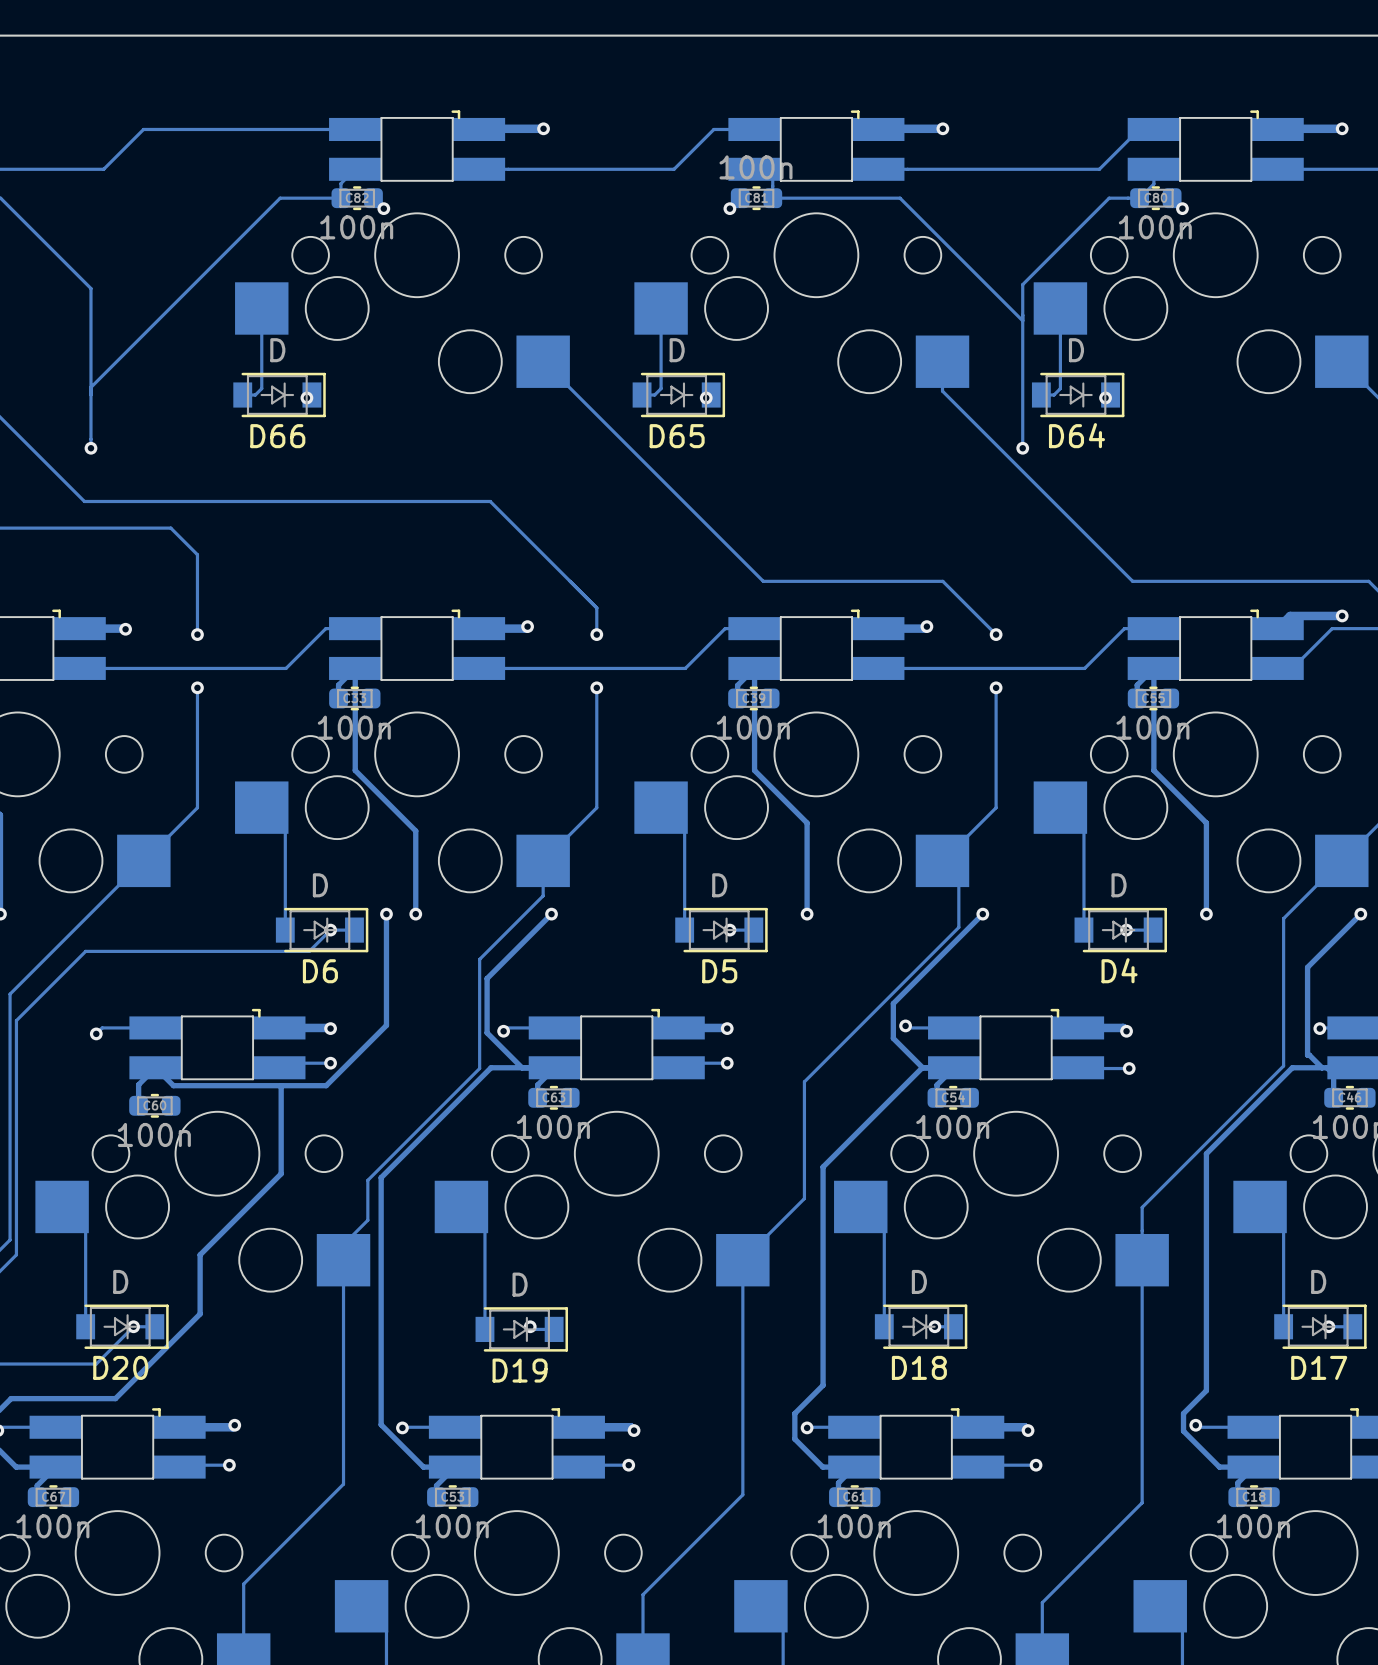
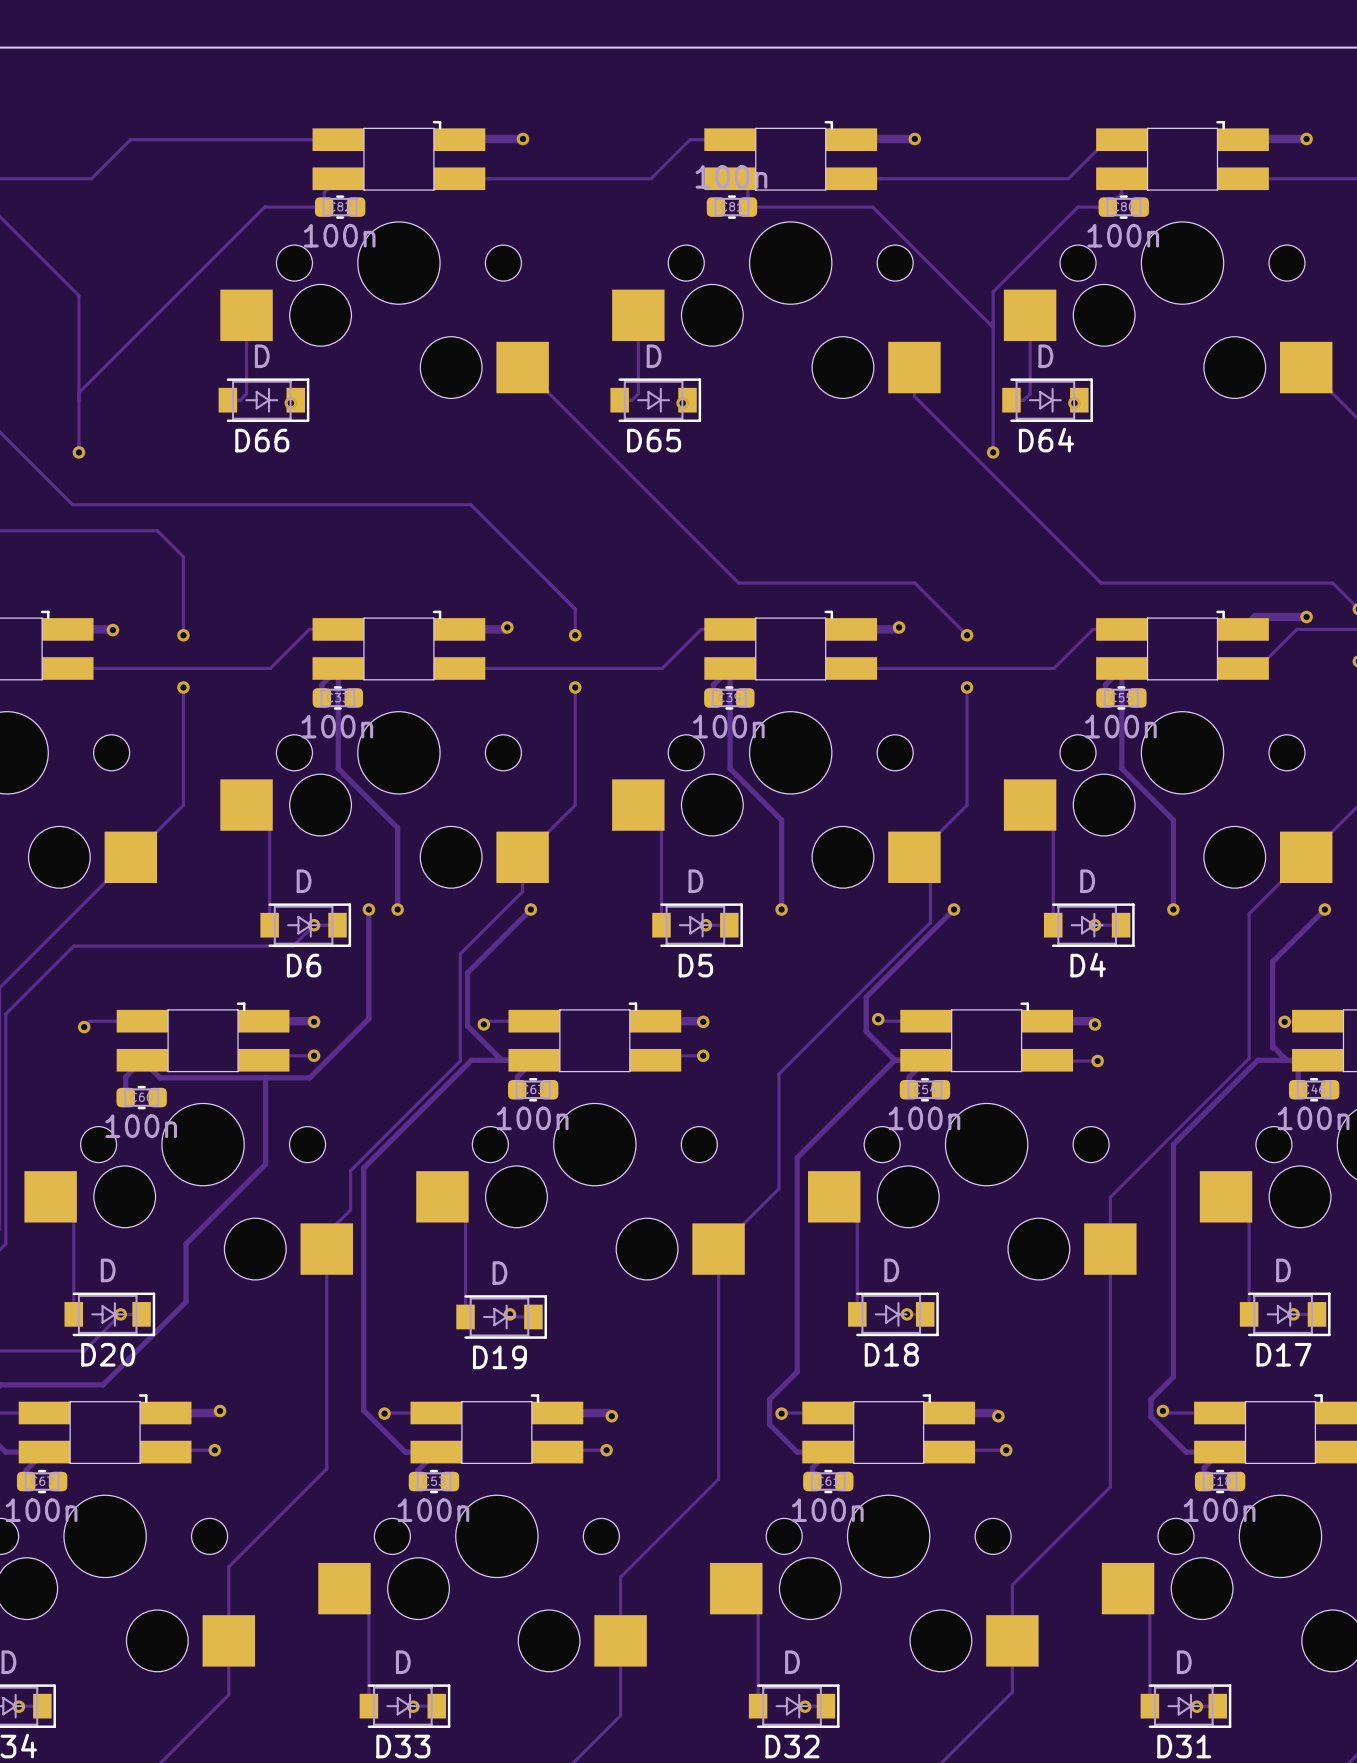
via: (383, 208) -> none
via: (729, 208) -> none
via: (1182, 208) -> none

